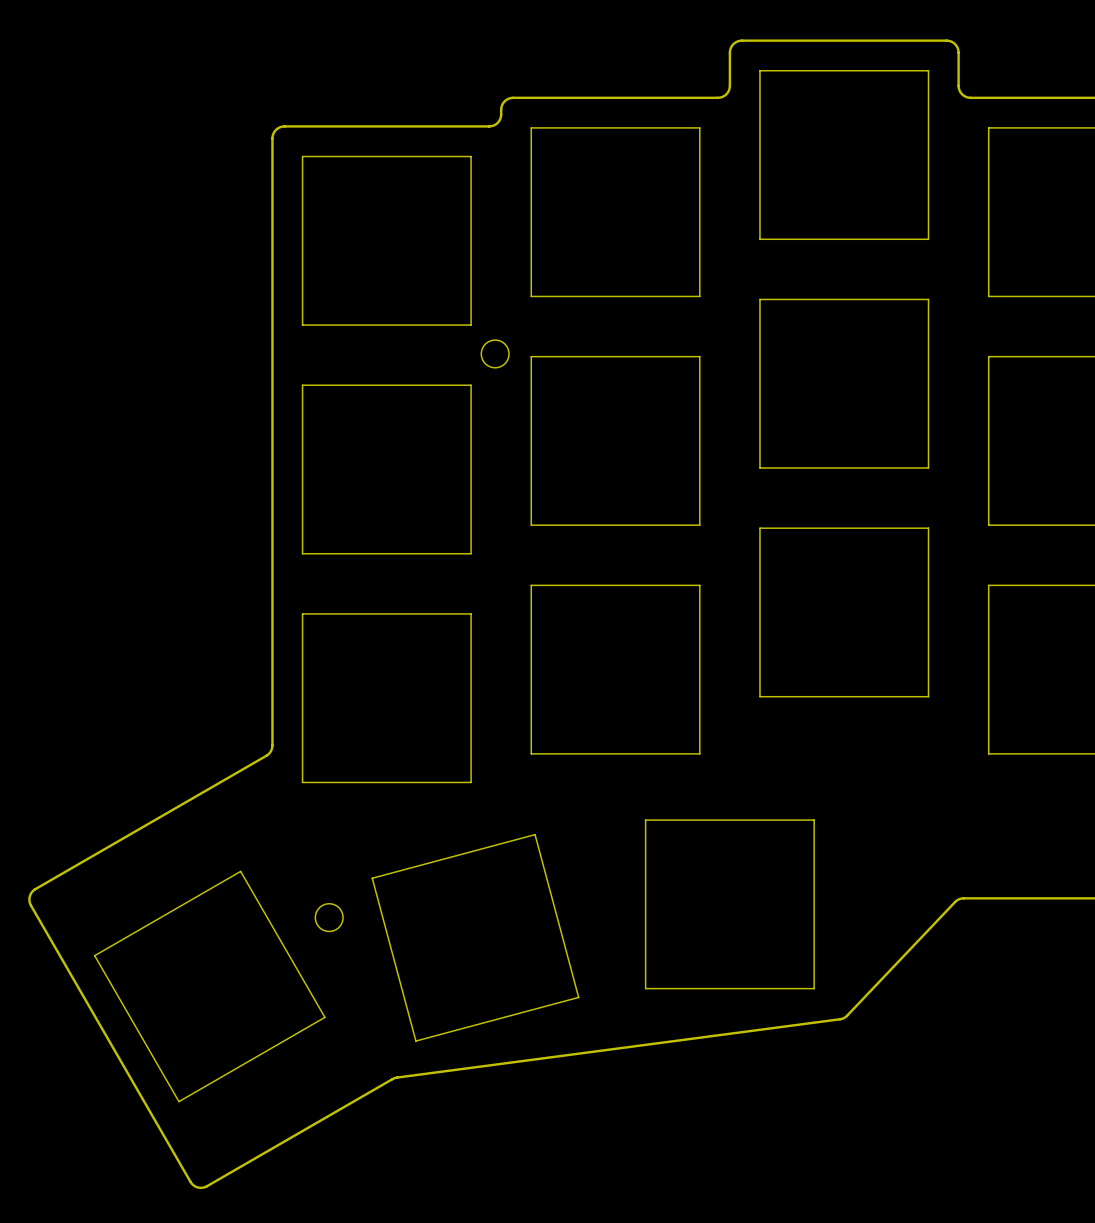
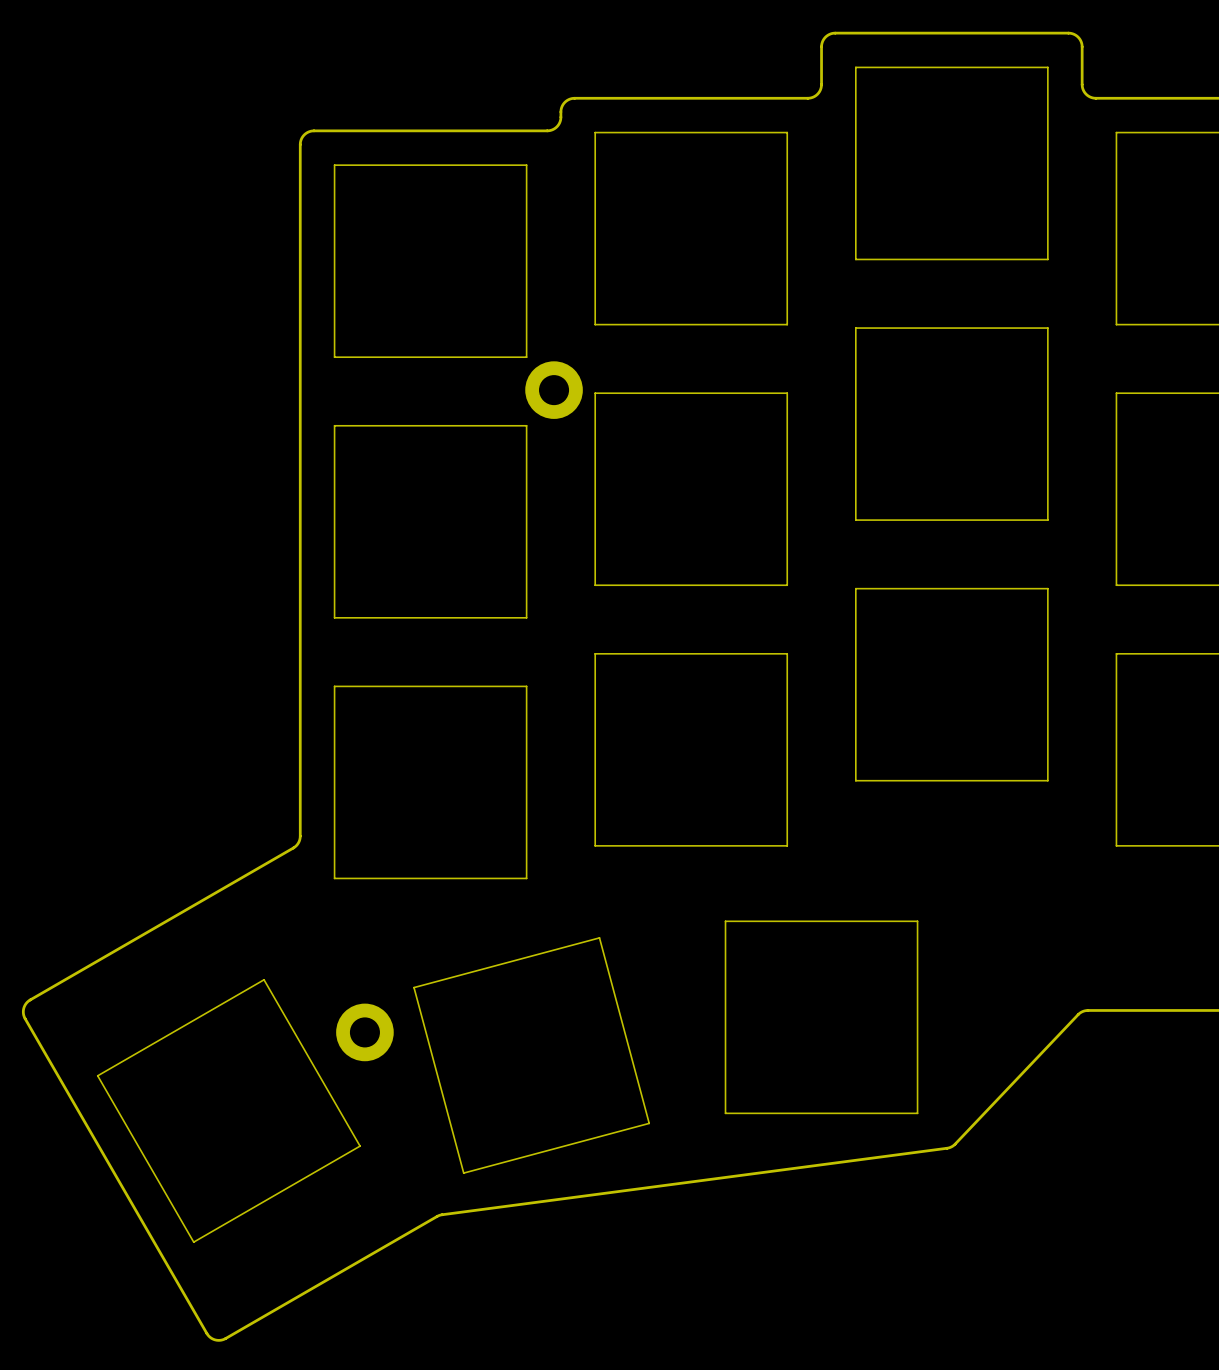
drawing: [480, 339, 510, 369] -> none
part: none -> (554, 390)
drawing: [314, 903, 344, 933] -> none
part: none -> (364, 1032)

